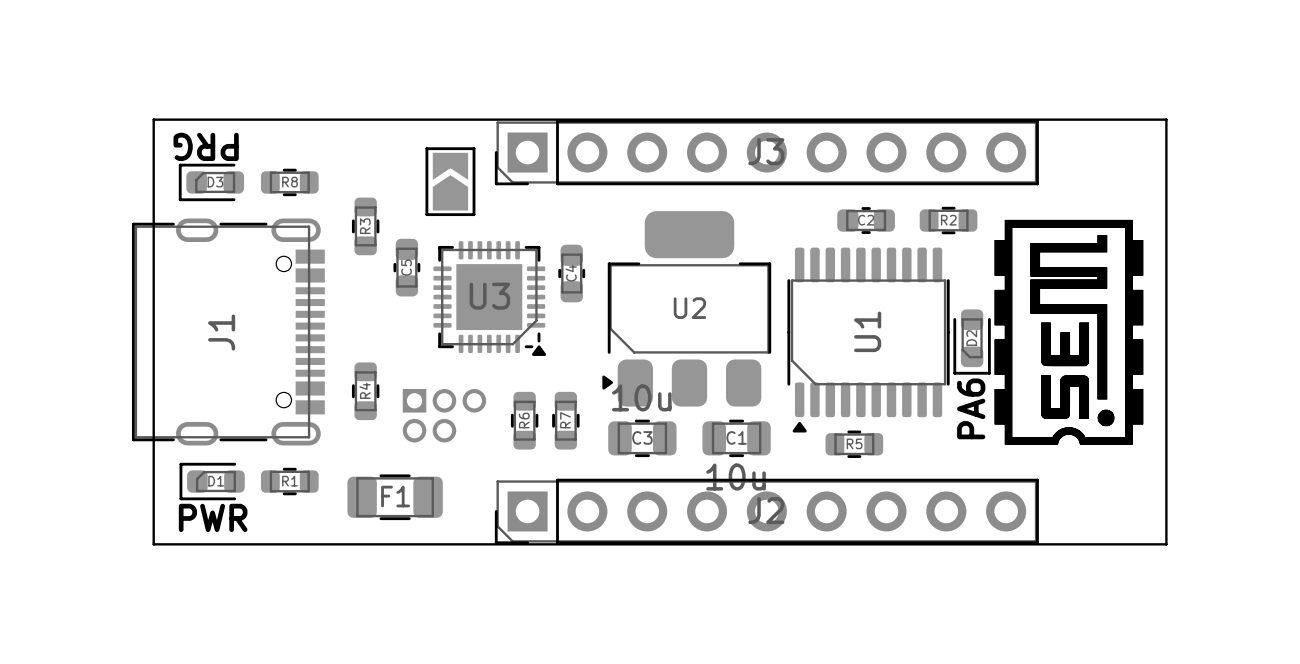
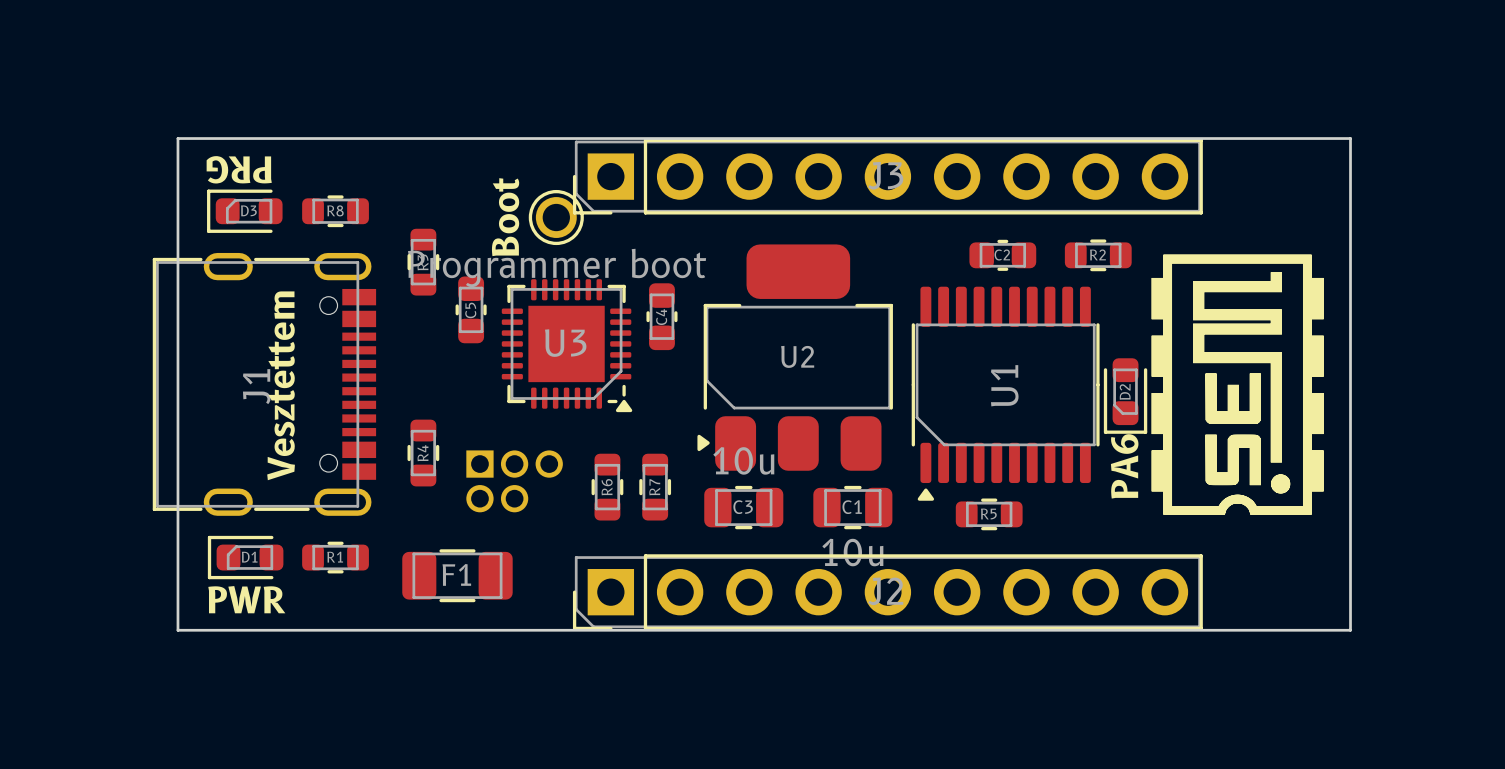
part: (450, 181) -> none
text: none -> Boot (505, 217)
part: none -> Programmer boot (556, 217)
text: none -> Vesztettem (281, 385)

